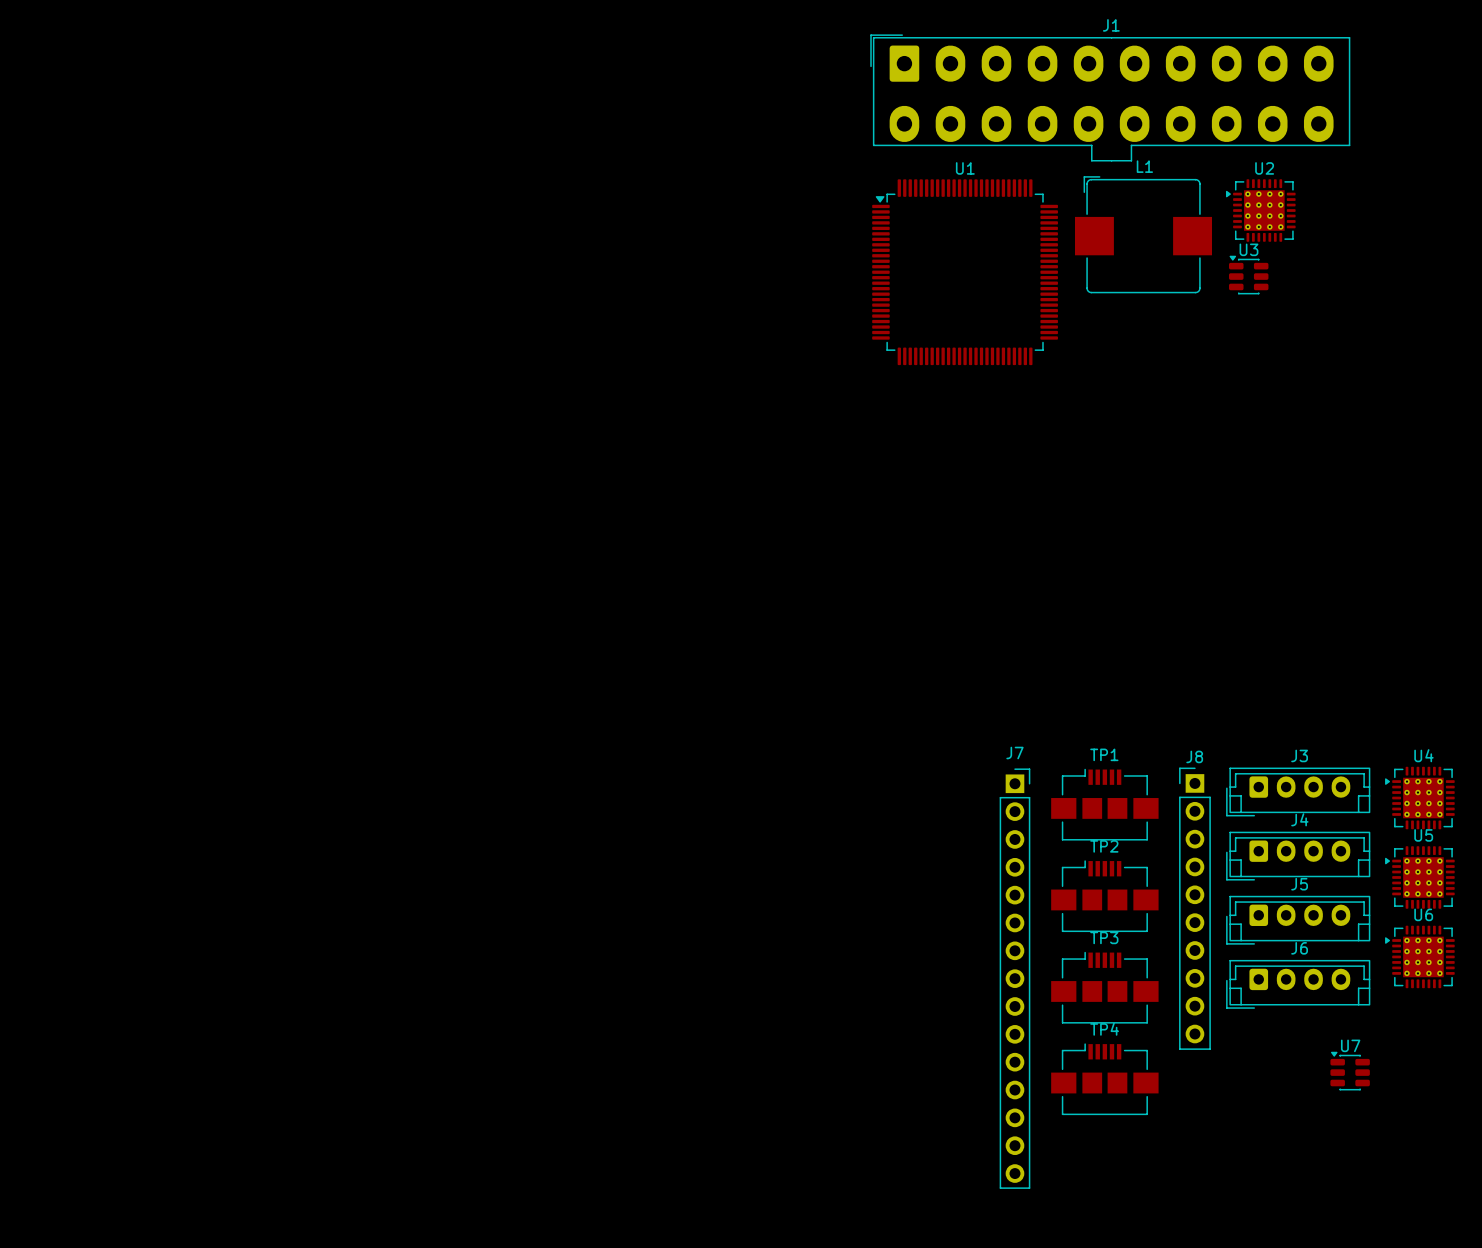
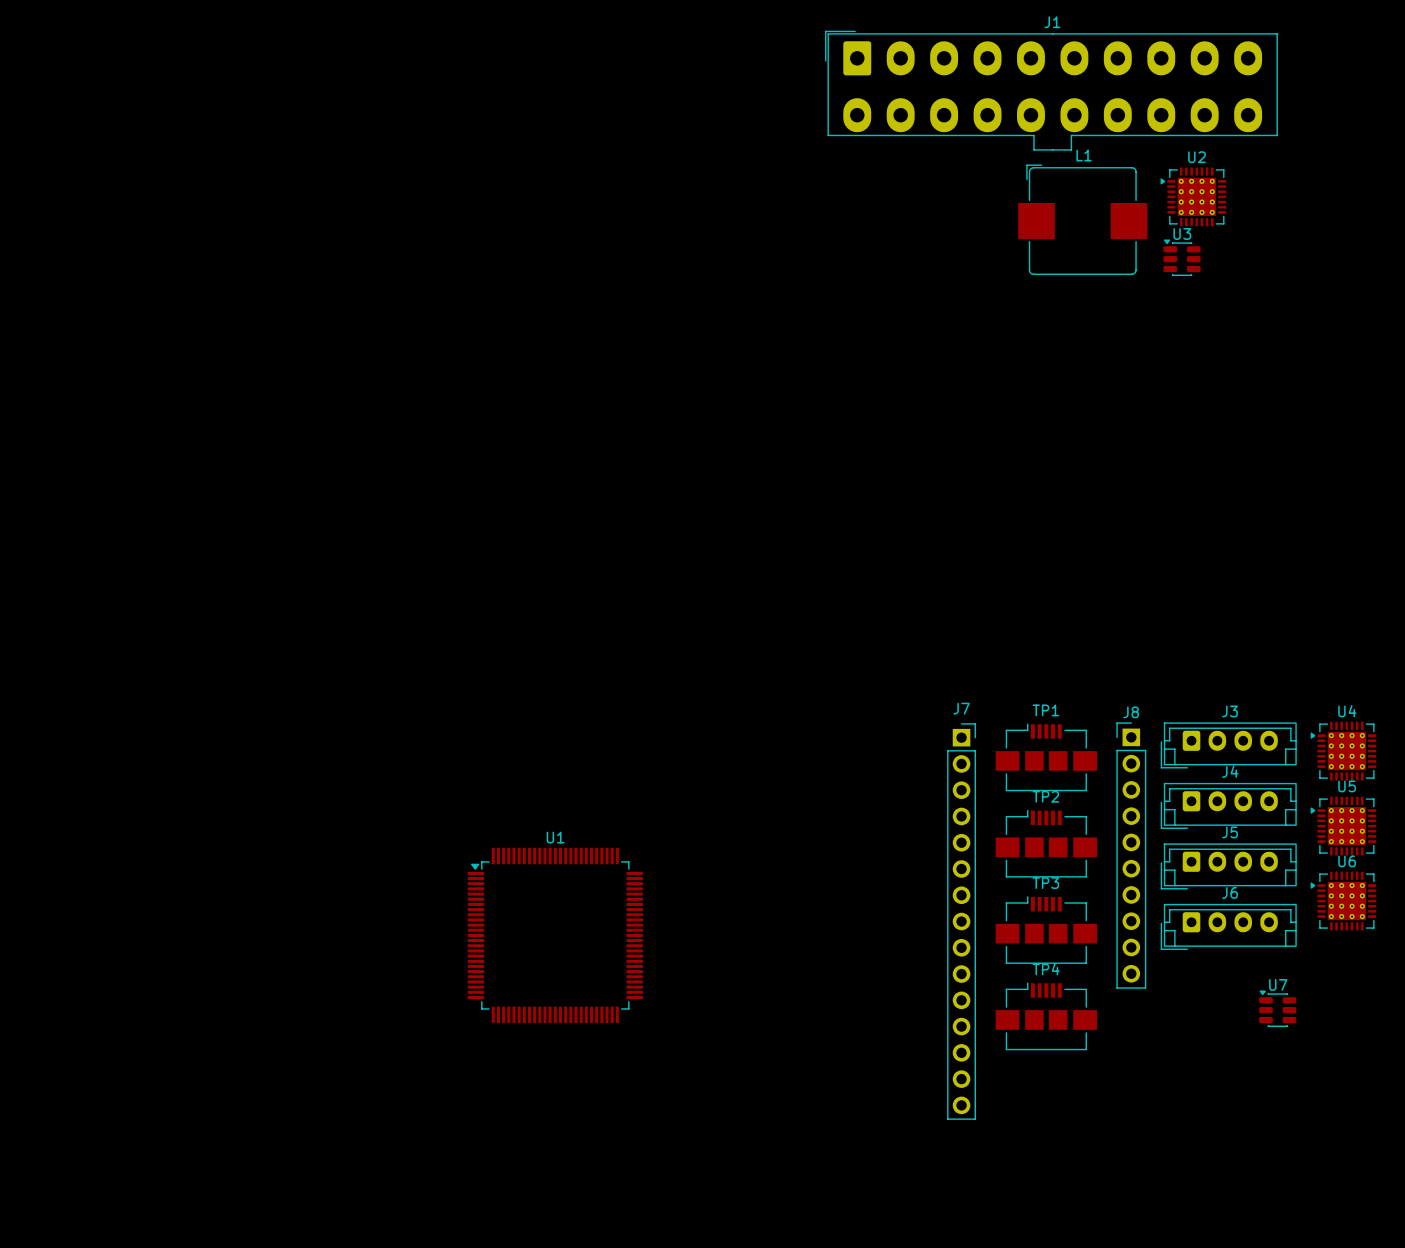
U1 position: (965, 272) -> (555, 935)

